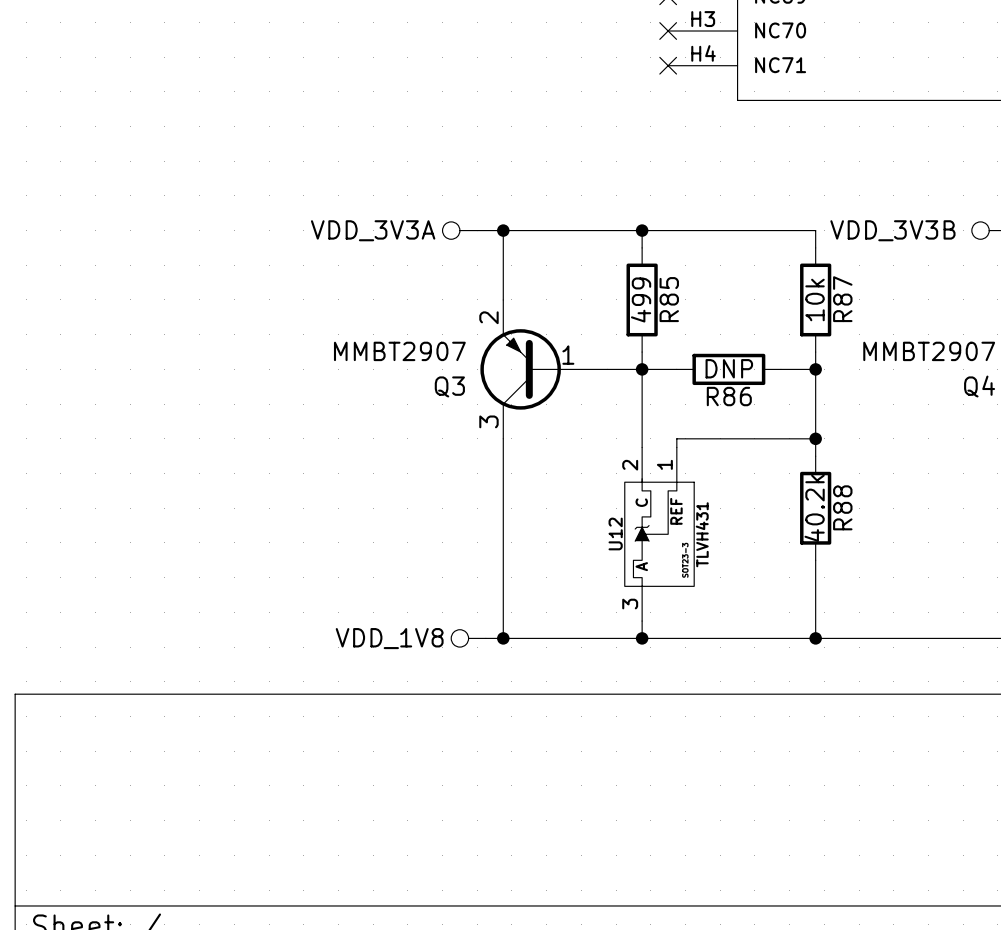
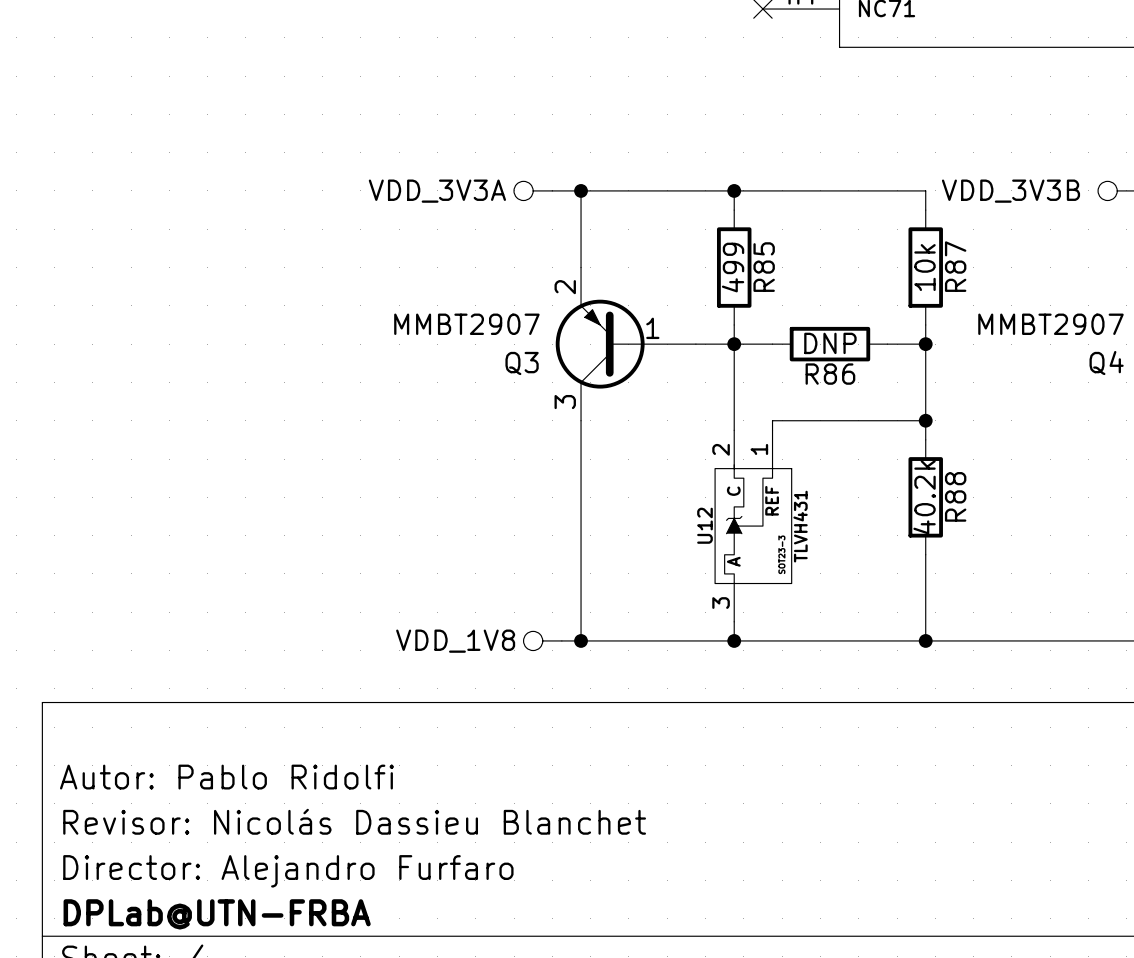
title block: none -> Autor: Pablo Ridolfi (226, 777)
title block: none -> Revisor: Nicolás Dassieu Blanchet (354, 821)
title block: none -> Director: Alejandro Furfaro (288, 871)
title block: none -> DPLab@UTN-FRBA (217, 914)

